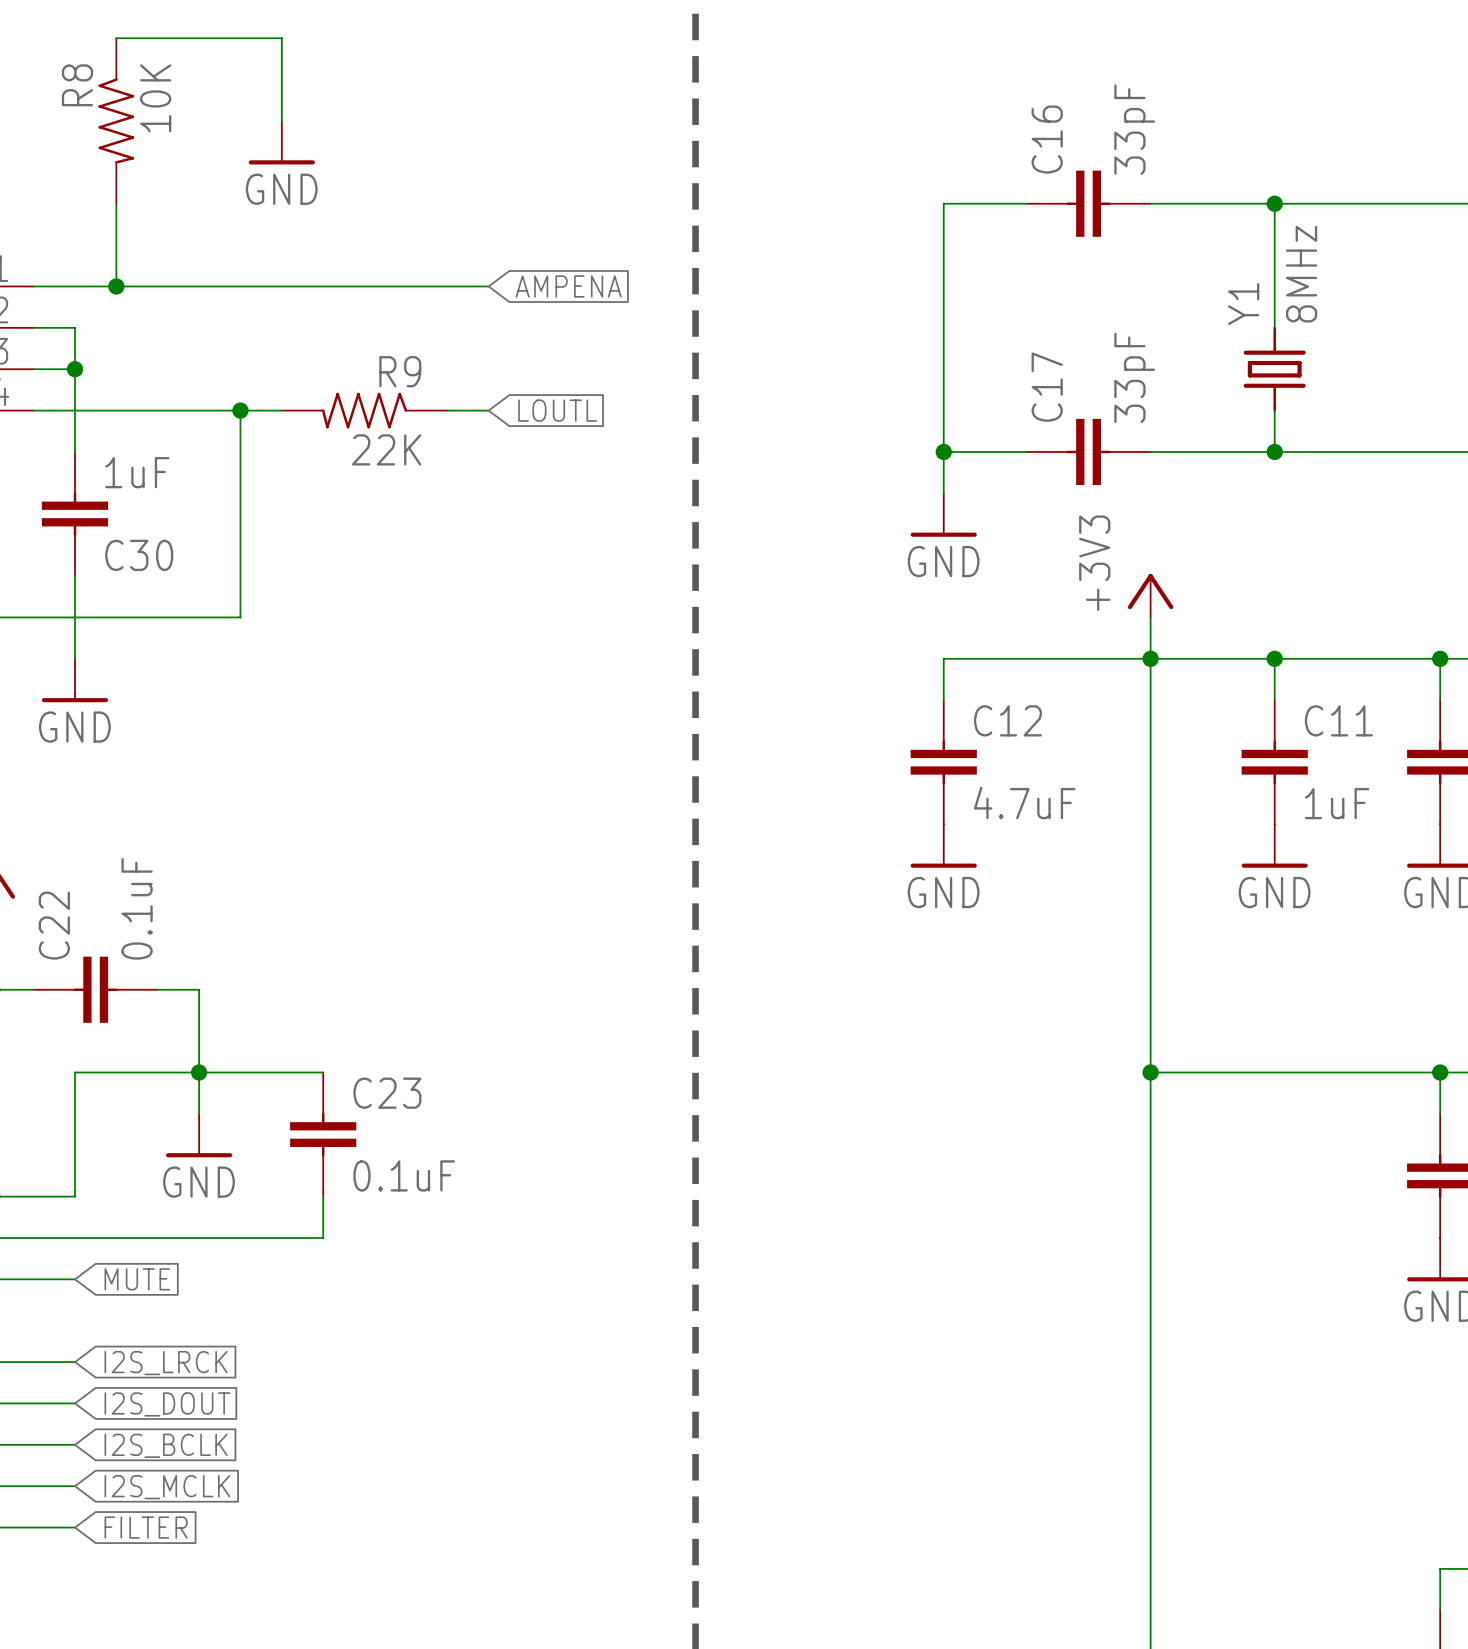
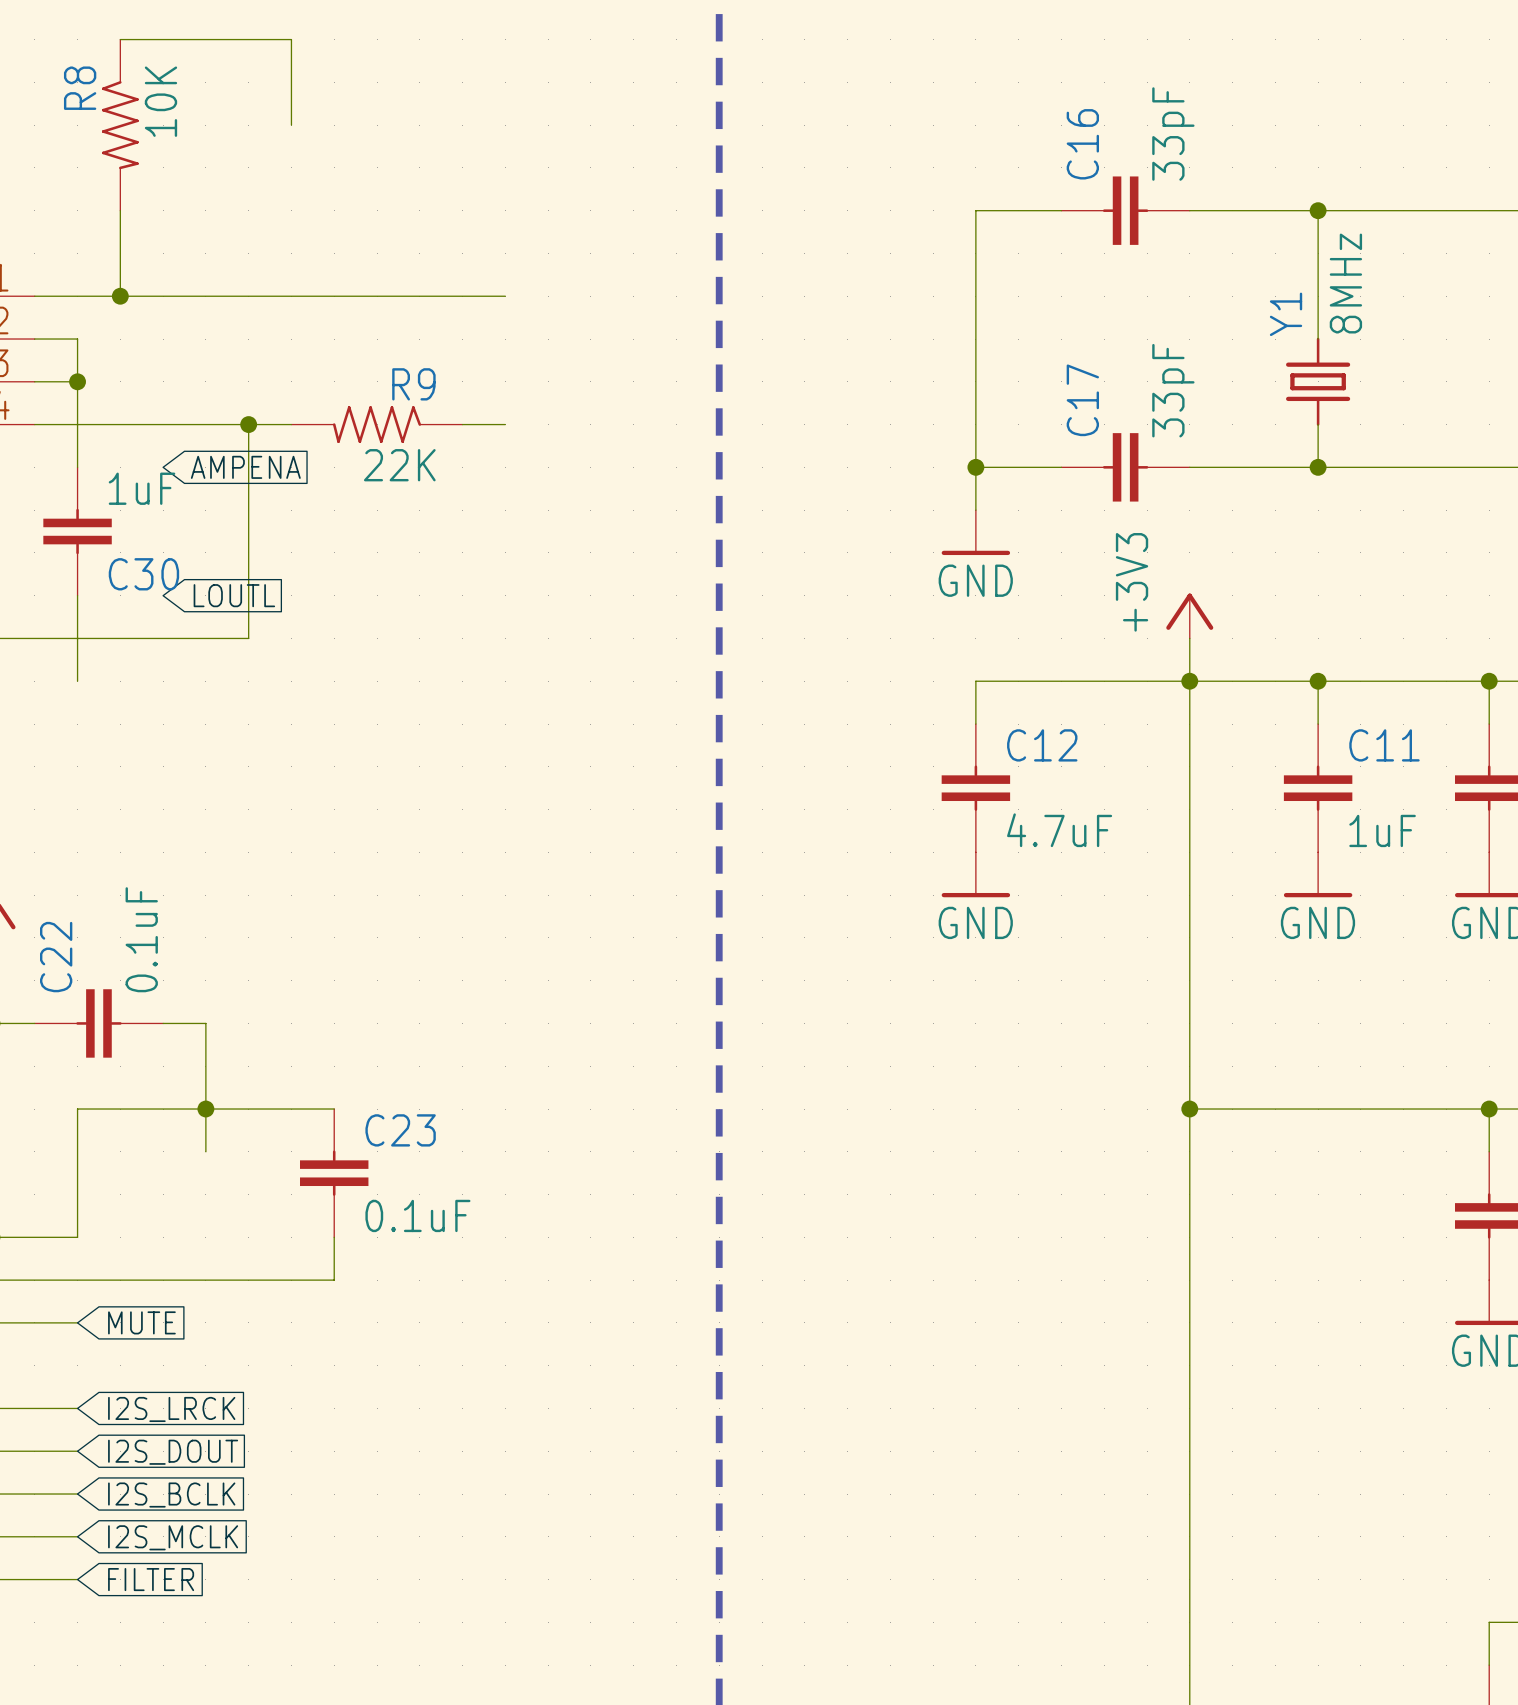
power symbol: GND (281, 142) -> none
global label position: AMPENA (568, 286) -> AMPENA (245, 467)
global label position: LOUTL (557, 410) -> LOUTL (234, 595)
power symbol: GND (75, 680) -> none
power symbol: GND (199, 1135) -> none

